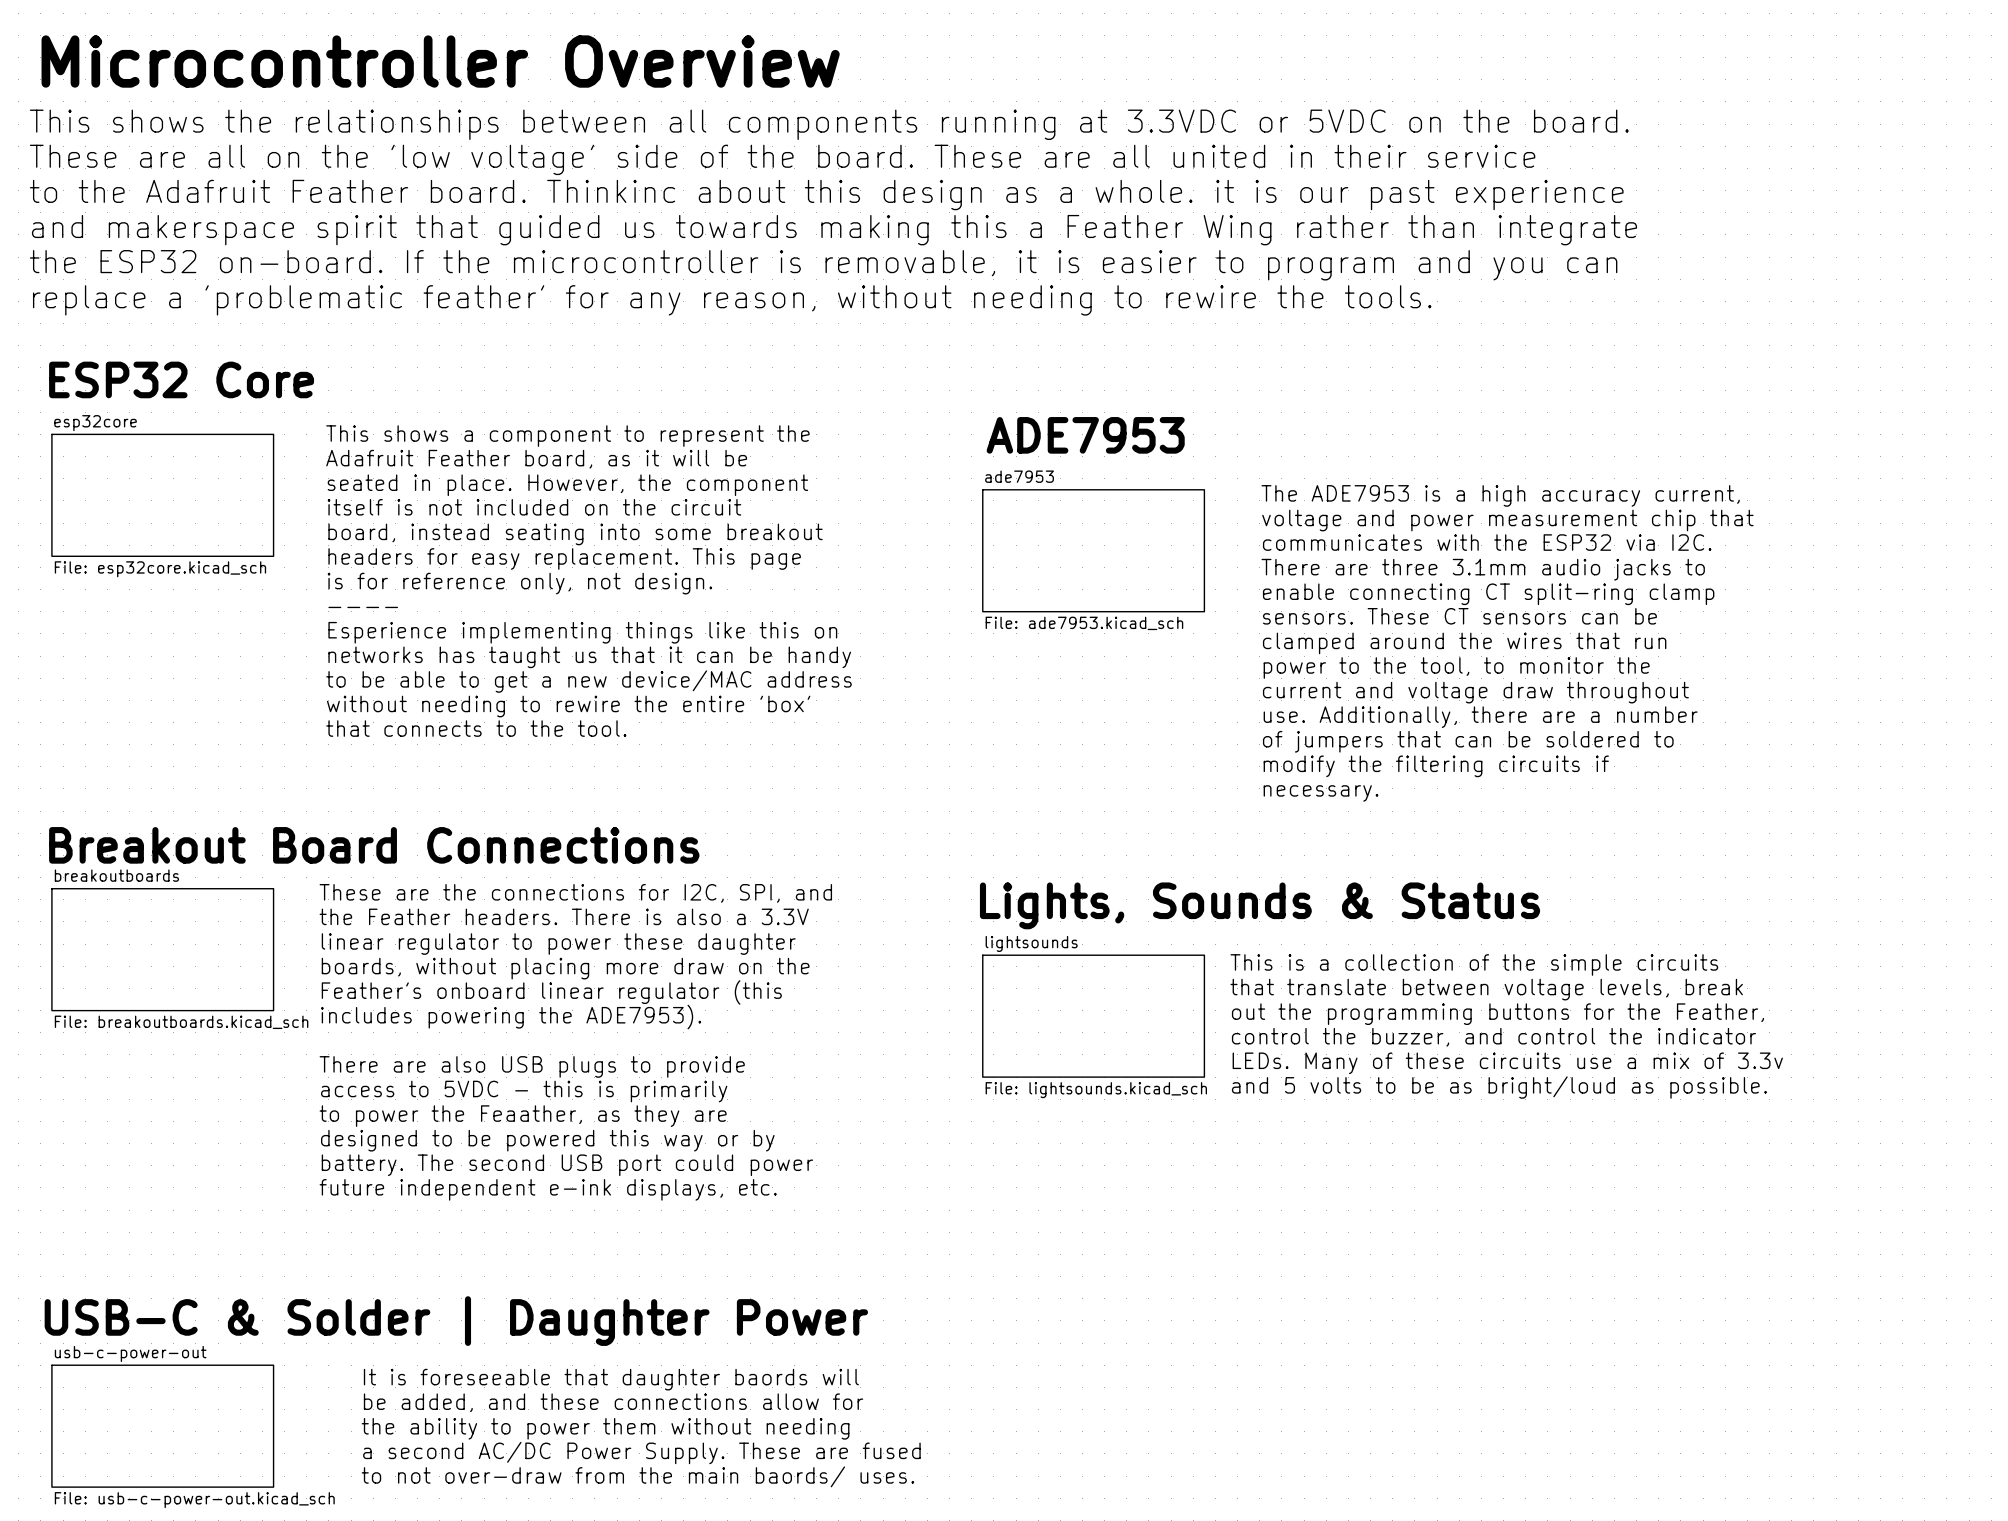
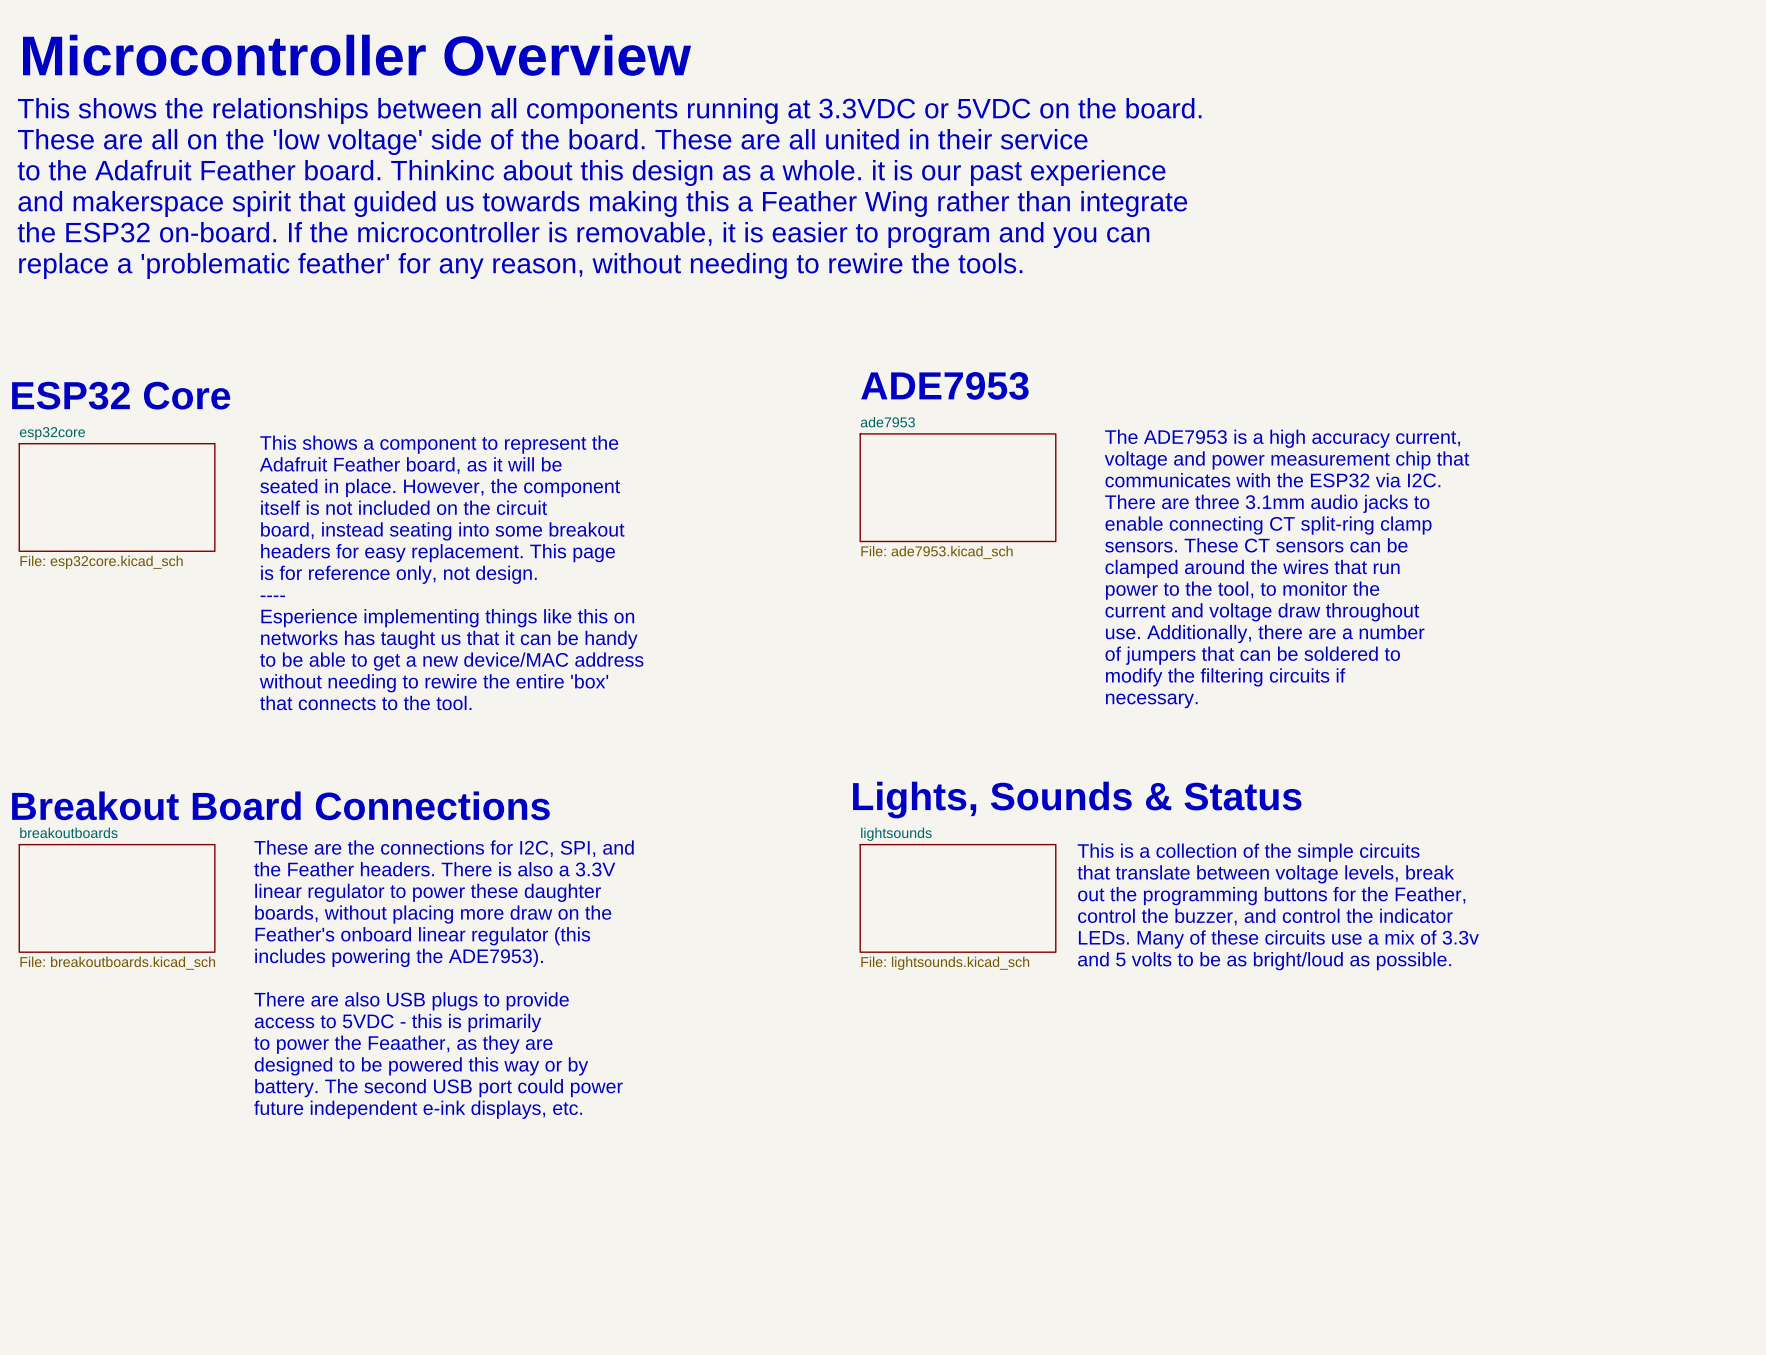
text position: ESP32 Core (181, 379) -> ESP32 Core (121, 395)
text position: This shows a component to represent the (567, 436) -> This shows a component to represent the (439, 444)
text position: Adafruit Feather board, as it will be (536, 459) -> Adafruit Feather board, as it will be (410, 465)
text position: seated in place. However, the component (567, 485) -> seated in place. However, the component (440, 488)
sheet esp32core position: (162, 495) -> (117, 497)
text position: itself is not included on the circuit (534, 507) -> itself is not included on the circuit (404, 507)
text position: board, instead seating into some breakout (575, 534) -> board, instead seating into some breakout (442, 531)
text position: headers for easy replacement. This page (564, 559) -> headers for easy replacement. This page (438, 553)
text position: is for reference only, not design. (519, 583) -> is for reference only, not design. (398, 574)
text position: ---- (363, 607) -> ---- (272, 596)
text position: Esperience implementing things like this on (582, 632) -> Esperience implementing things like this on (447, 618)
text position: networks has taught us that it can be handy (589, 657) -> networks has taught us that it can be handy (449, 639)
text position: to be able to get a new device/MAC address (588, 681) -> to be able to get a new device/MAC address (451, 661)
text position: without needing to rewire the entire 'box' (568, 706) -> without needing to rewire the entire 'box' (433, 683)
text position: that connects to the tool. (476, 728) -> that connects to the tool. (365, 703)
text position: Breakout Board Connections (374, 845) -> Breakout Board Connections (280, 805)
text position: These are the connections for I2C, SPI, and (575, 893) -> These are the connections for I2C, SPI, and (444, 848)
text position: the Feather headers. There is also a 3.3V (564, 916) -> the Feather headers. There is also a 3.3V (434, 869)
text position: linear regulator to power these daughter (558, 944) -> linear regulator to power these daughter (428, 892)
sheet breakoutboards position: (162, 949) -> (117, 898)
text position: boards, without placing more draw on the (565, 968) -> boards, without placing more draw on the (433, 914)
text position: Feather's onboard linear regulator (this (551, 992) -> Feather's onboard linear regulator (this (422, 936)
text position: includes powering the ADE7953). (511, 1017) -> includes powering the ADE7953). (399, 957)
text position: There are also USB plugs to provide (532, 1066) -> There are also USB plugs to provide (411, 1001)
text position: access to 5VDC - this is primarily (524, 1091) -> access to 5VDC - this is primarily (398, 1023)
text position: to power the Feaather, as they are (523, 1116) -> to power the Feaather, as they are (403, 1044)
text position: designed to be powered this way or by (547, 1140) -> designed to be powered this way or by (421, 1066)
text position: battery. The second USB port could power (567, 1165) -> battery. The second USB port could power (438, 1088)
text position: future independent e-ink displays, etc. (548, 1189) -> future independent e-ink displays, etc. (418, 1109)
text: USB-C & Solder | Daughter Power (456, 1321) -> none
text: It is foreseeable that daughter baords will (611, 1379) -> none
text: be added, and these connections allow for (613, 1402) -> none
sheet usb-c-power-out: File: usb-c-power-out.kicad_sch (162, 1426) -> none
text: the ability to power them without needing (605, 1428) -> none
text: a second AC/DC Power Supply. These are fused (641, 1453) -> none
text: to not over-draw from the main baords/ uses. (637, 1476) -> none

